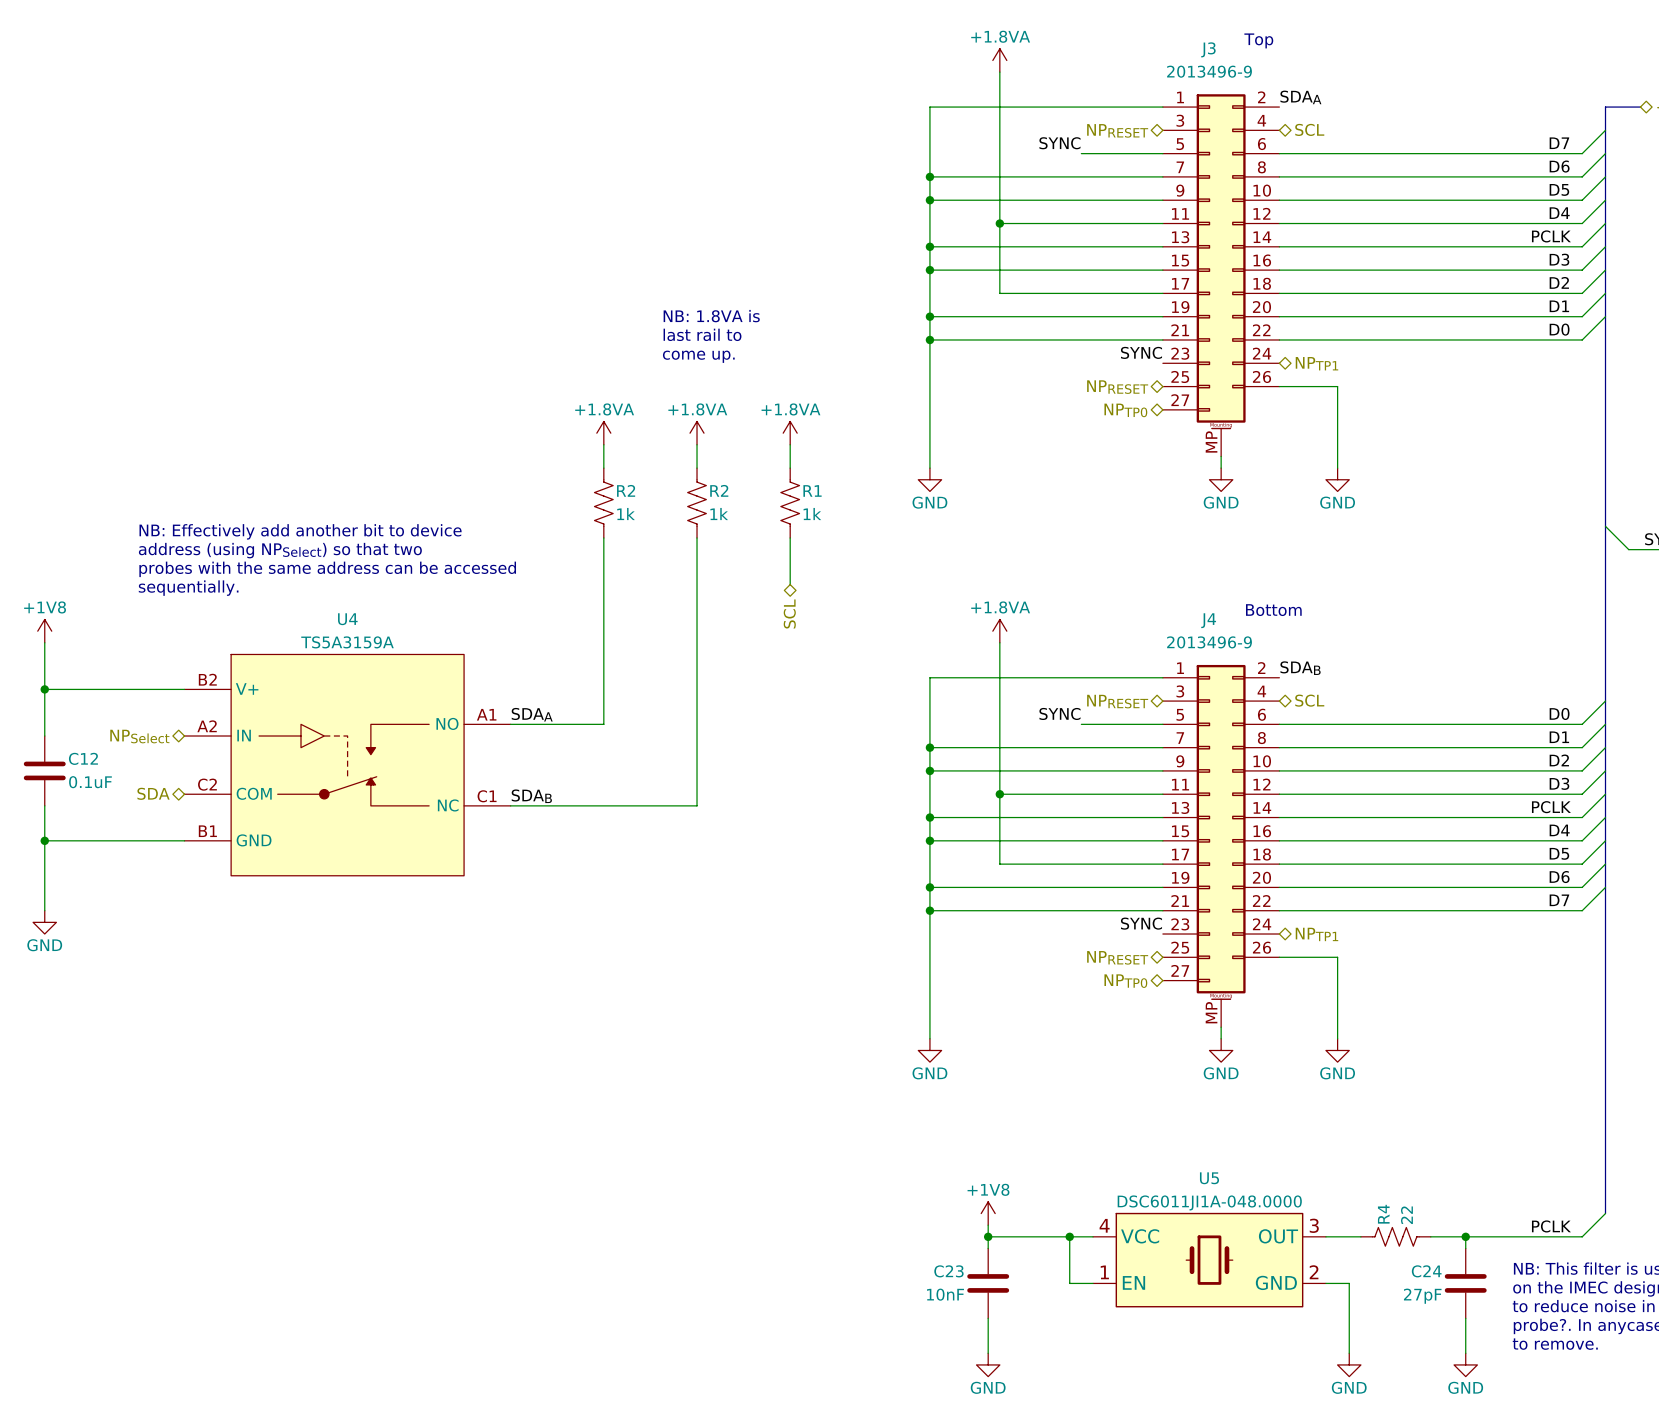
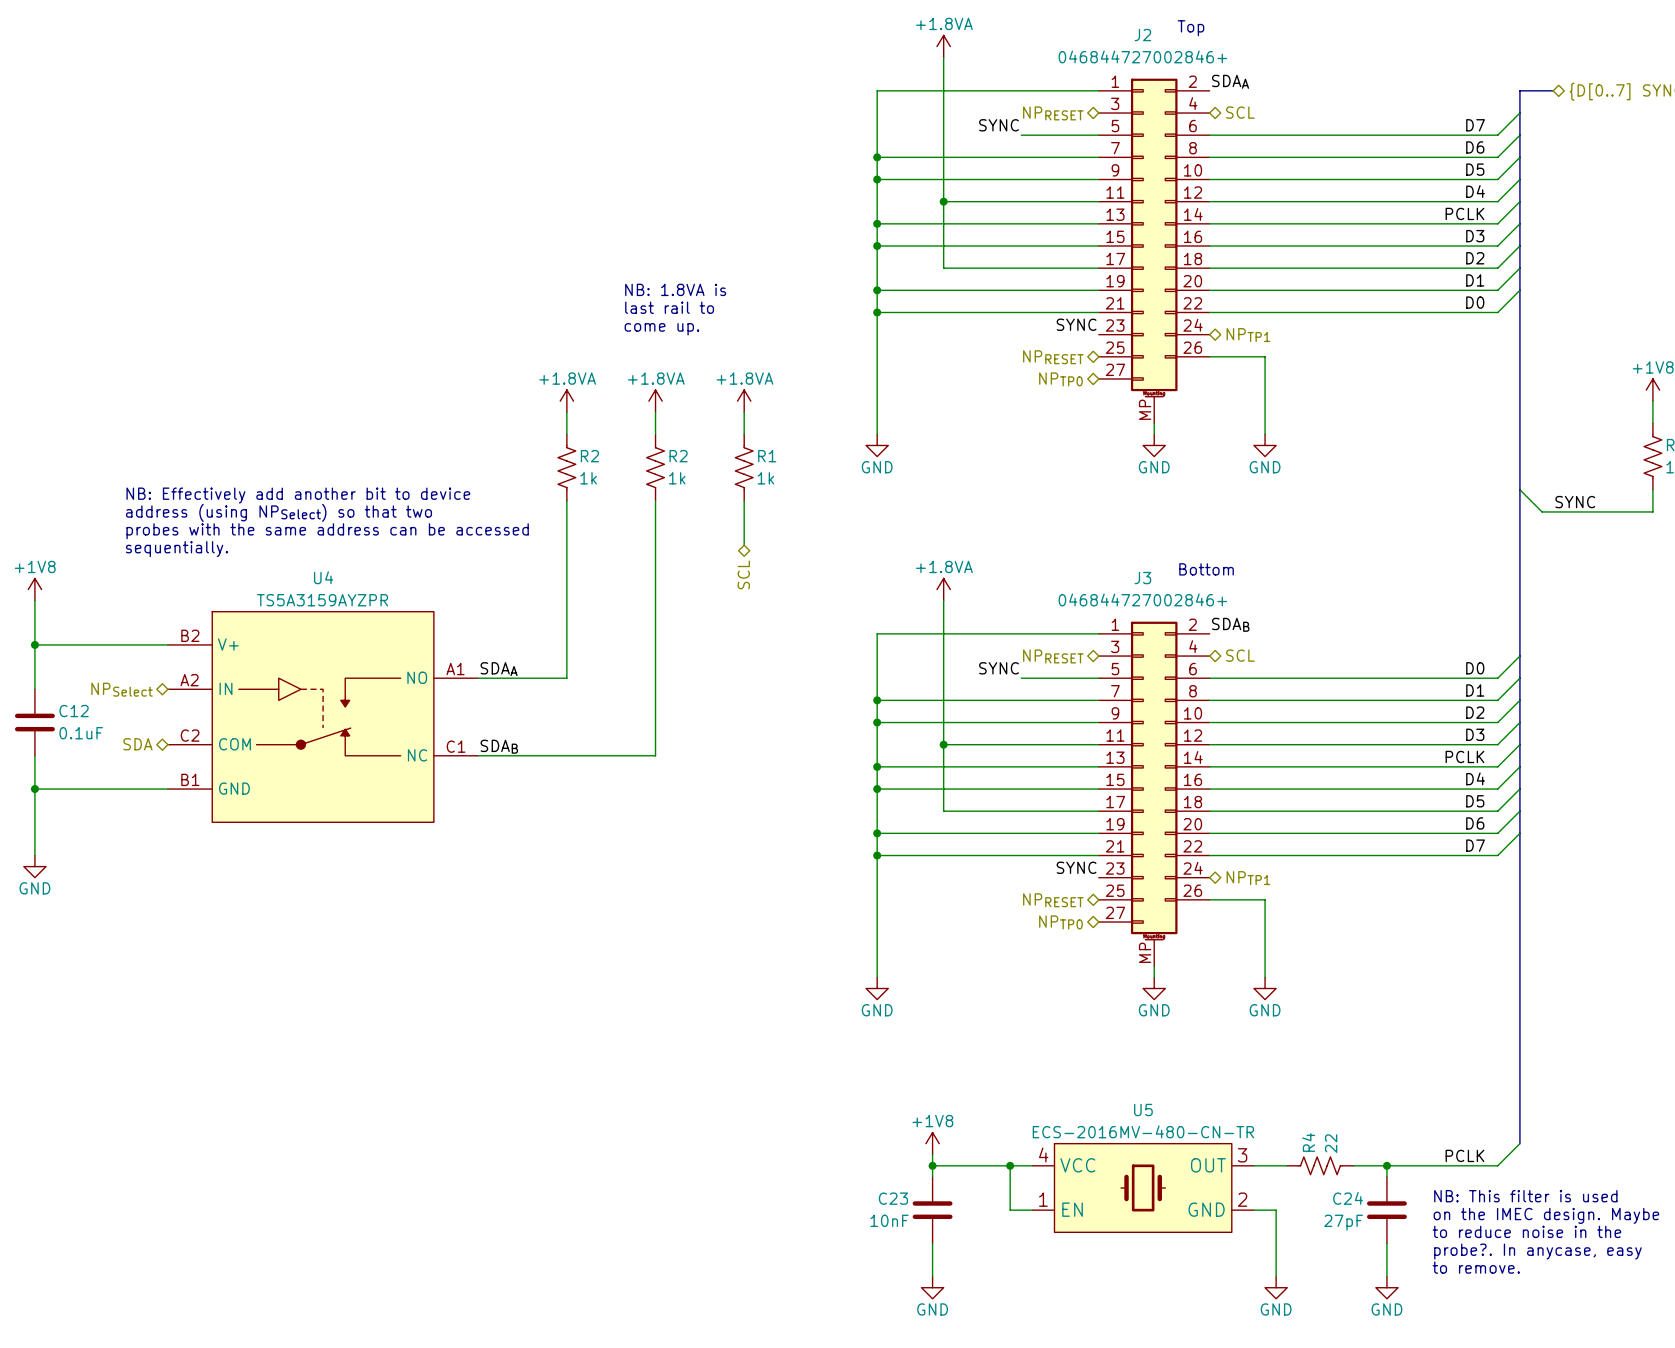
J3 name: J3 (1208, 49) -> J2 (1142, 35)
J3 value: 2013496-9 (1209, 71) -> 046844727002846+ (1142, 56)
J4 name: J4 (1208, 620) -> J3 (1142, 578)
U4 value: TS5A3159A (347, 642) -> TS5A3159AYZPR (322, 600)
J4 value: 2013496-9 (1209, 642) -> 046844727002846+ (1142, 599)
U5 value: DSC6011JI1A-048.0000 (1209, 1202) -> ECS-2016MV-480-CN-TR (1143, 1131)

